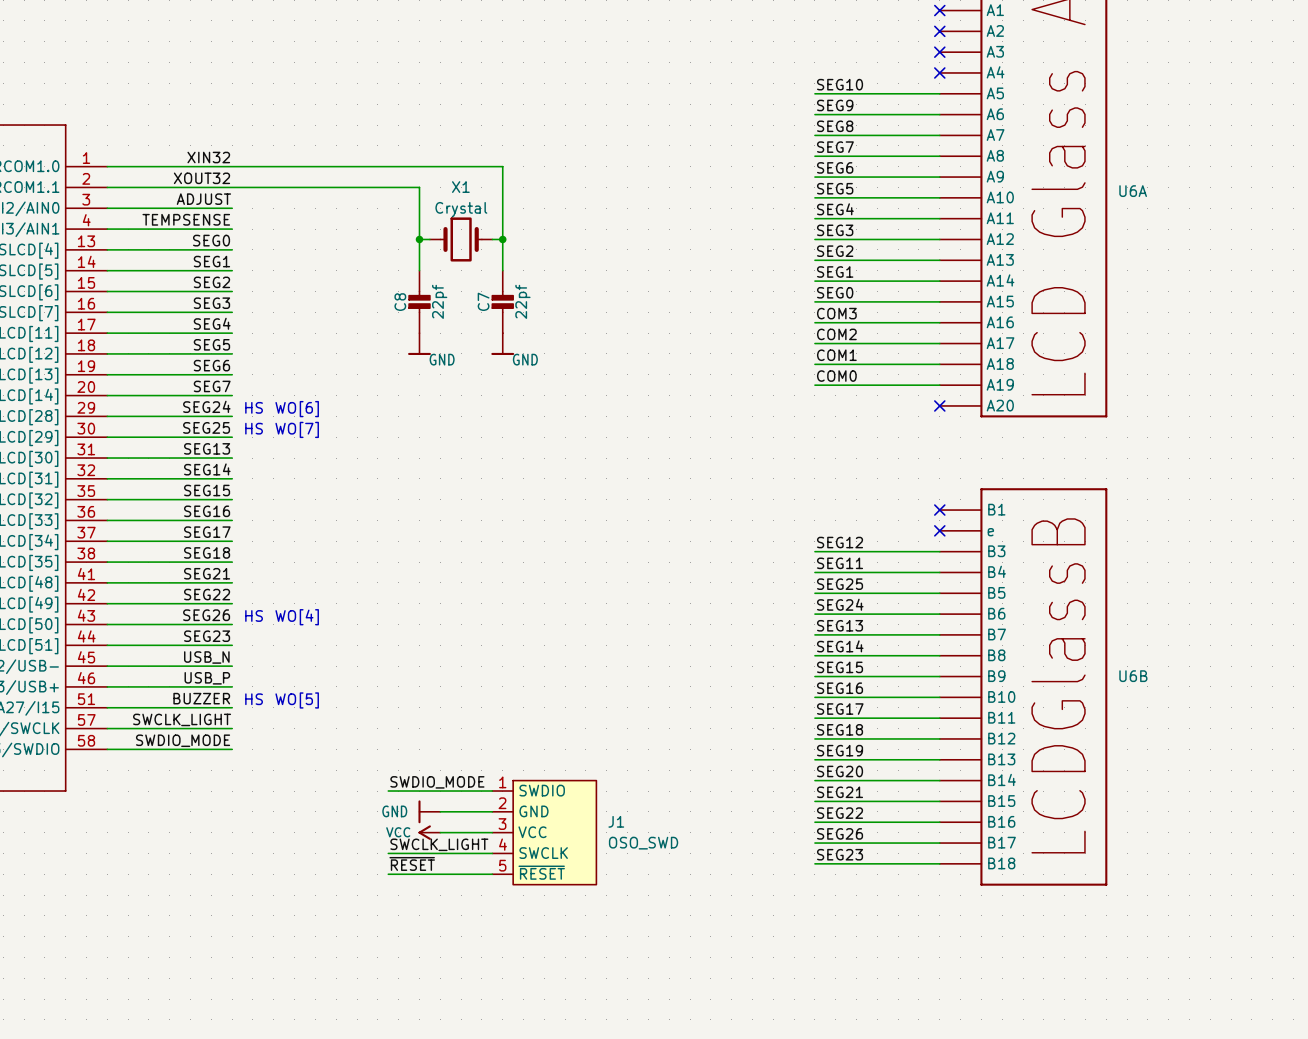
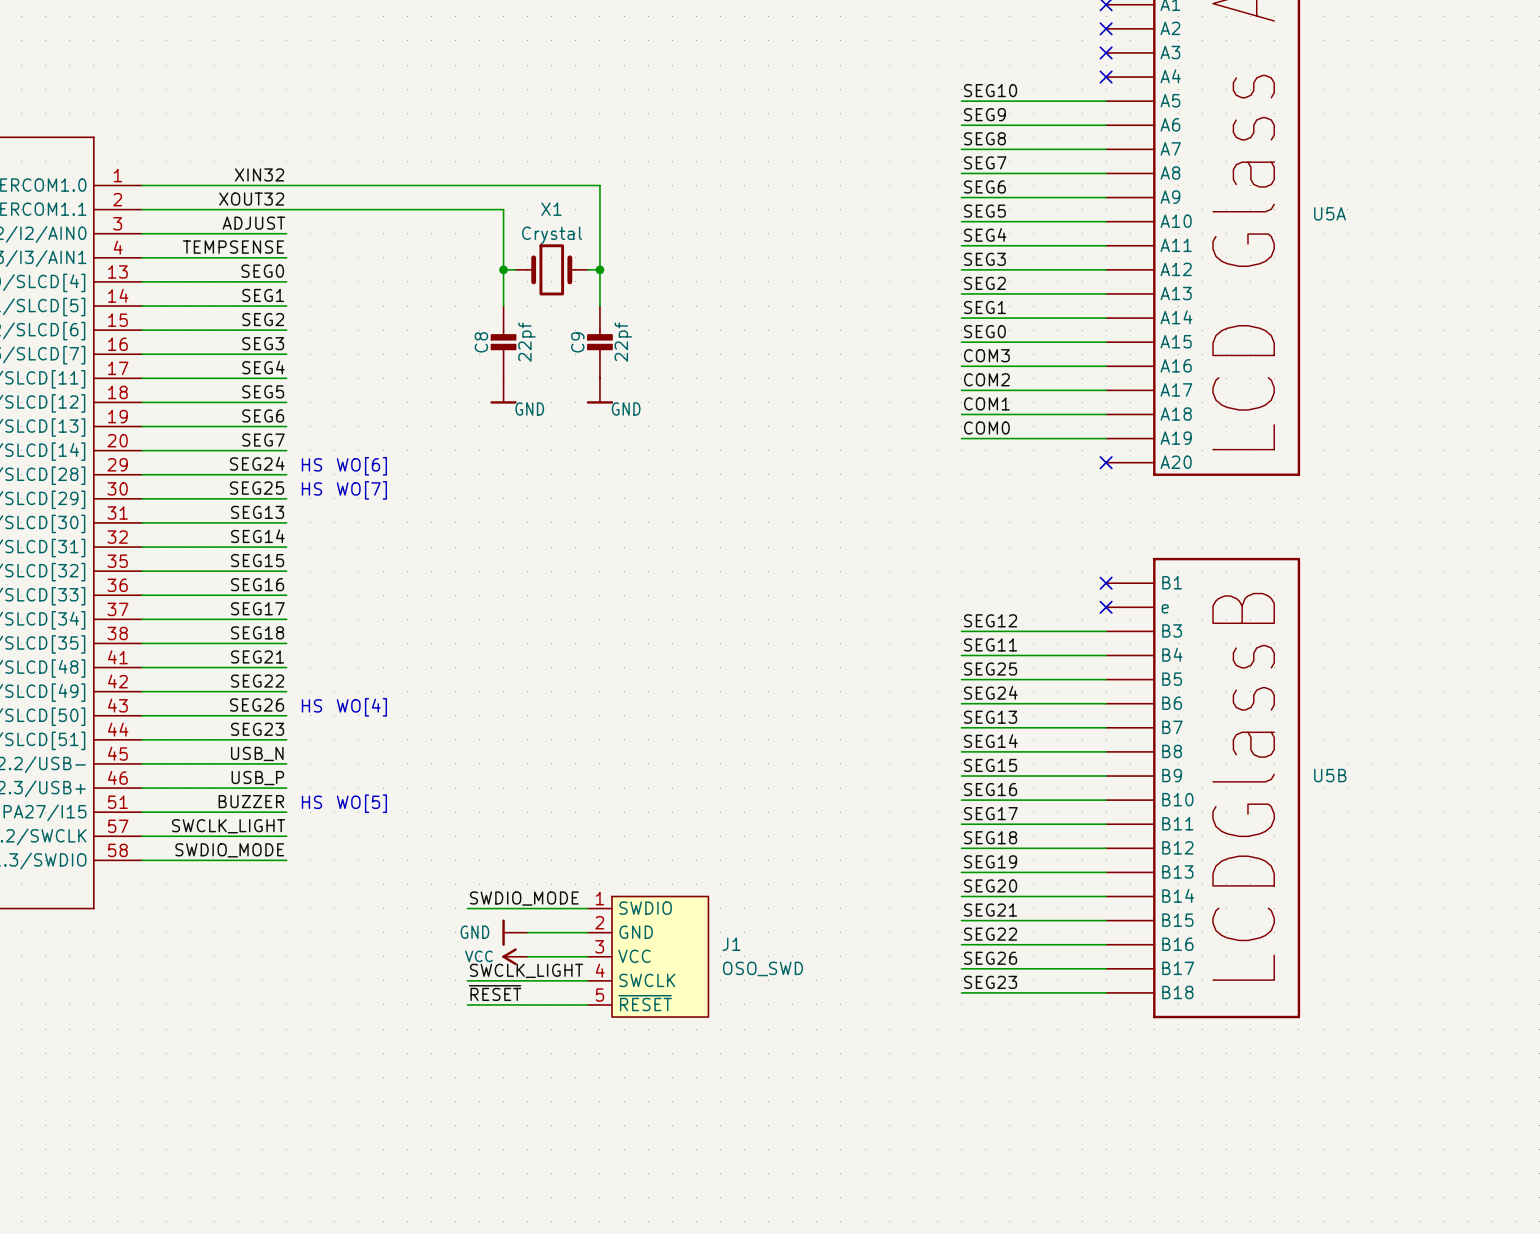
U6A name: U6A (1133, 191) -> U5A (1330, 213)
C7 name: C7 (483, 301) -> C9 (577, 342)
U6B name: U6B (1133, 676) -> U5B (1330, 775)

